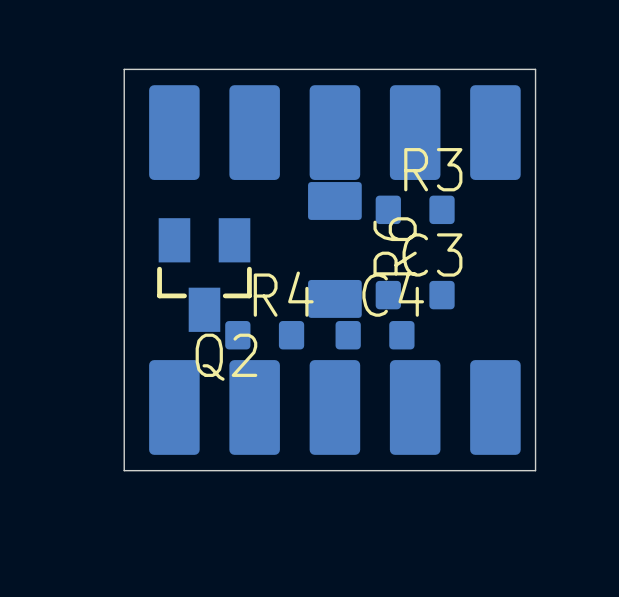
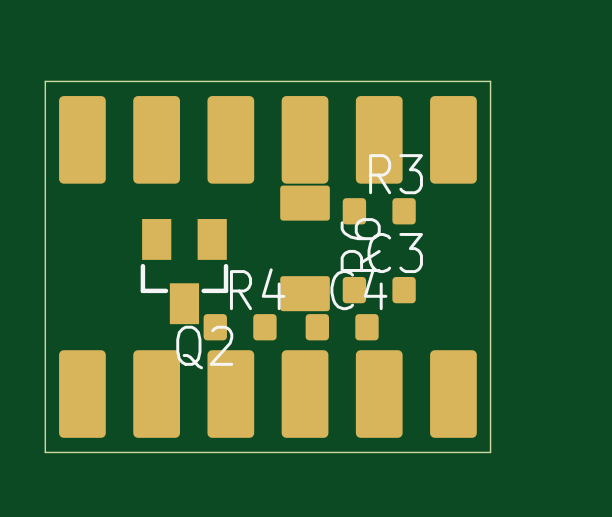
board edge: (124, 69) (124, 470) -> (110, 81) (45, 81) (45, 452) (110, 452)
part: none -> (267, 139)
part: none -> (267, 394)

